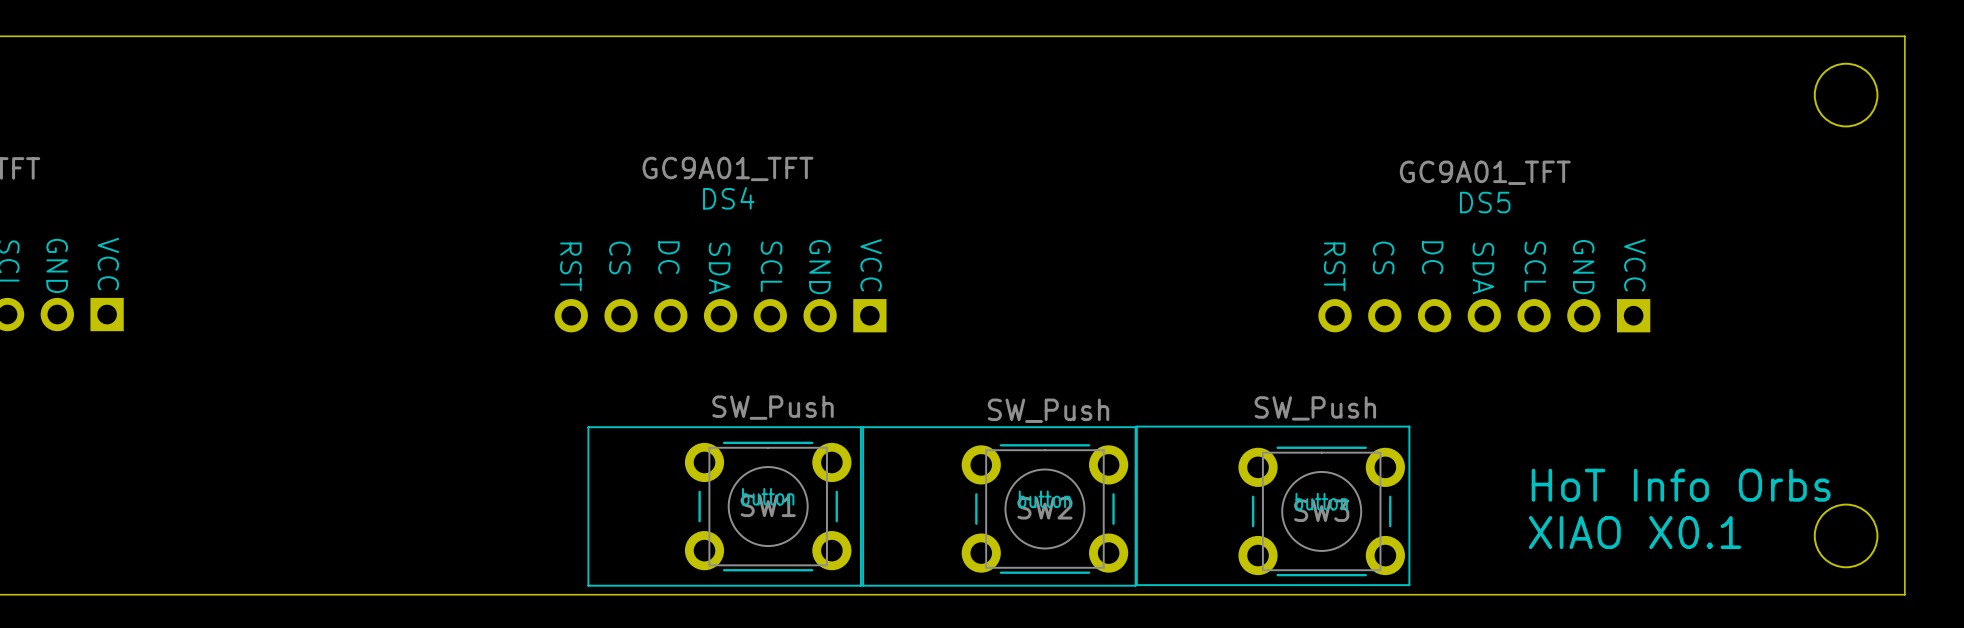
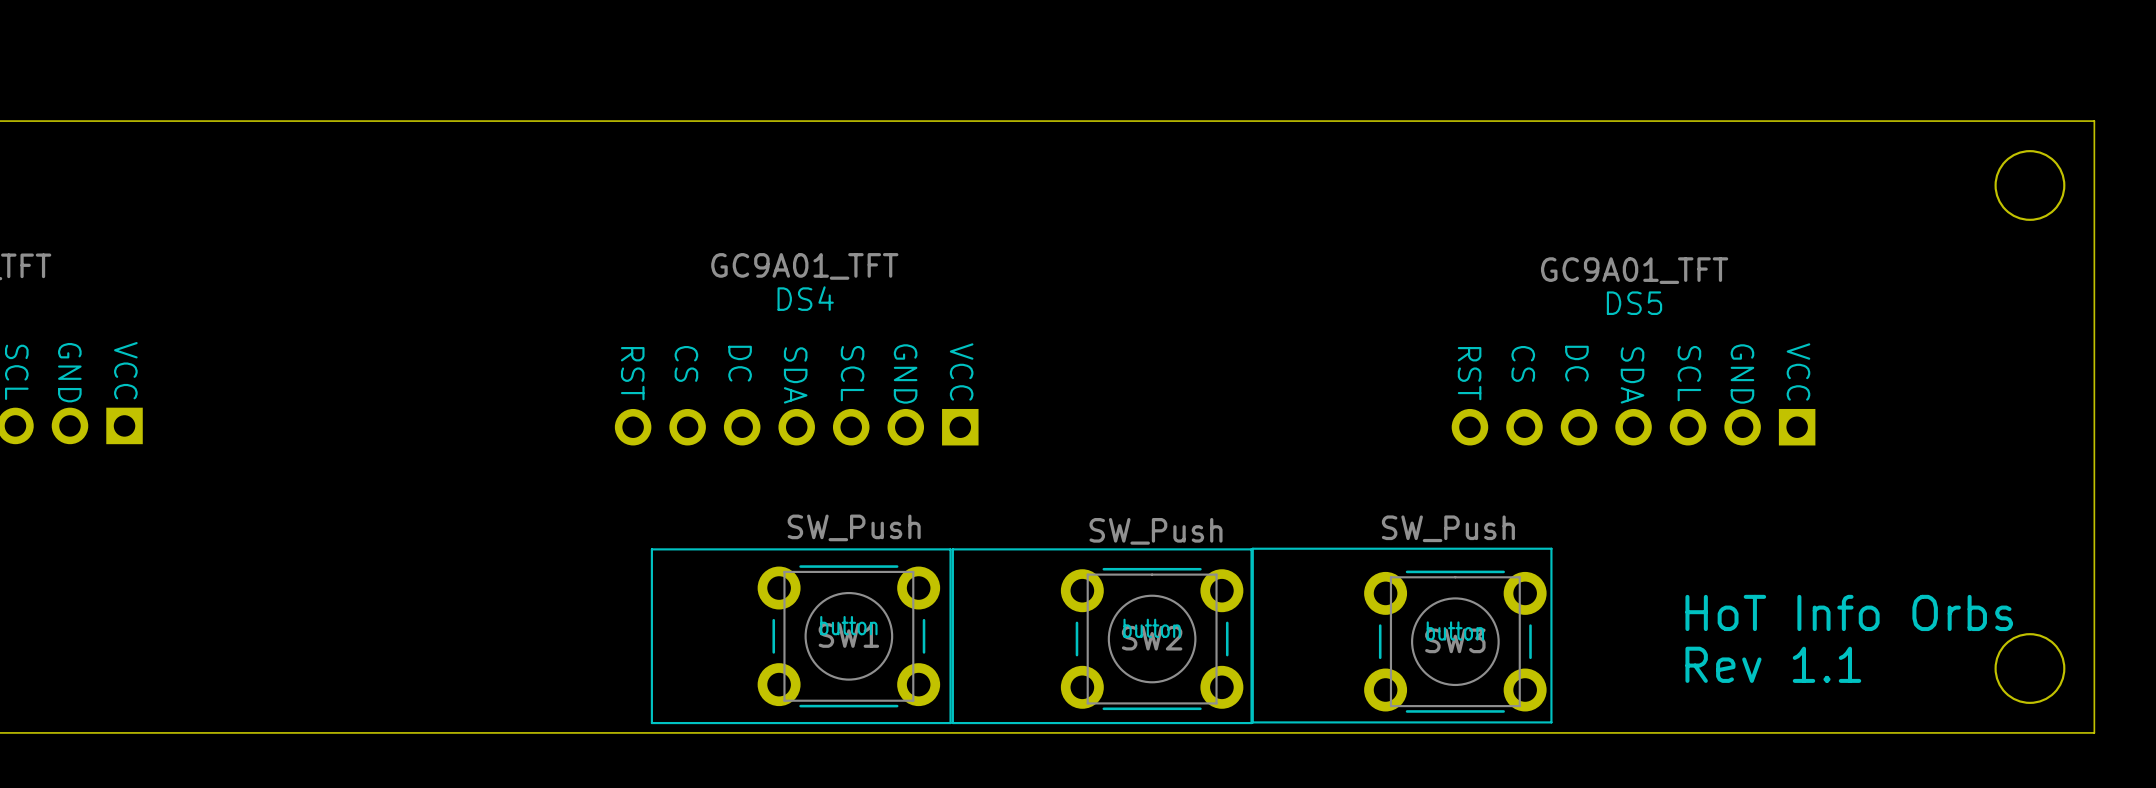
text: XIAO X0.1 (1634, 532) -> Rev 1.1 (1773, 664)

